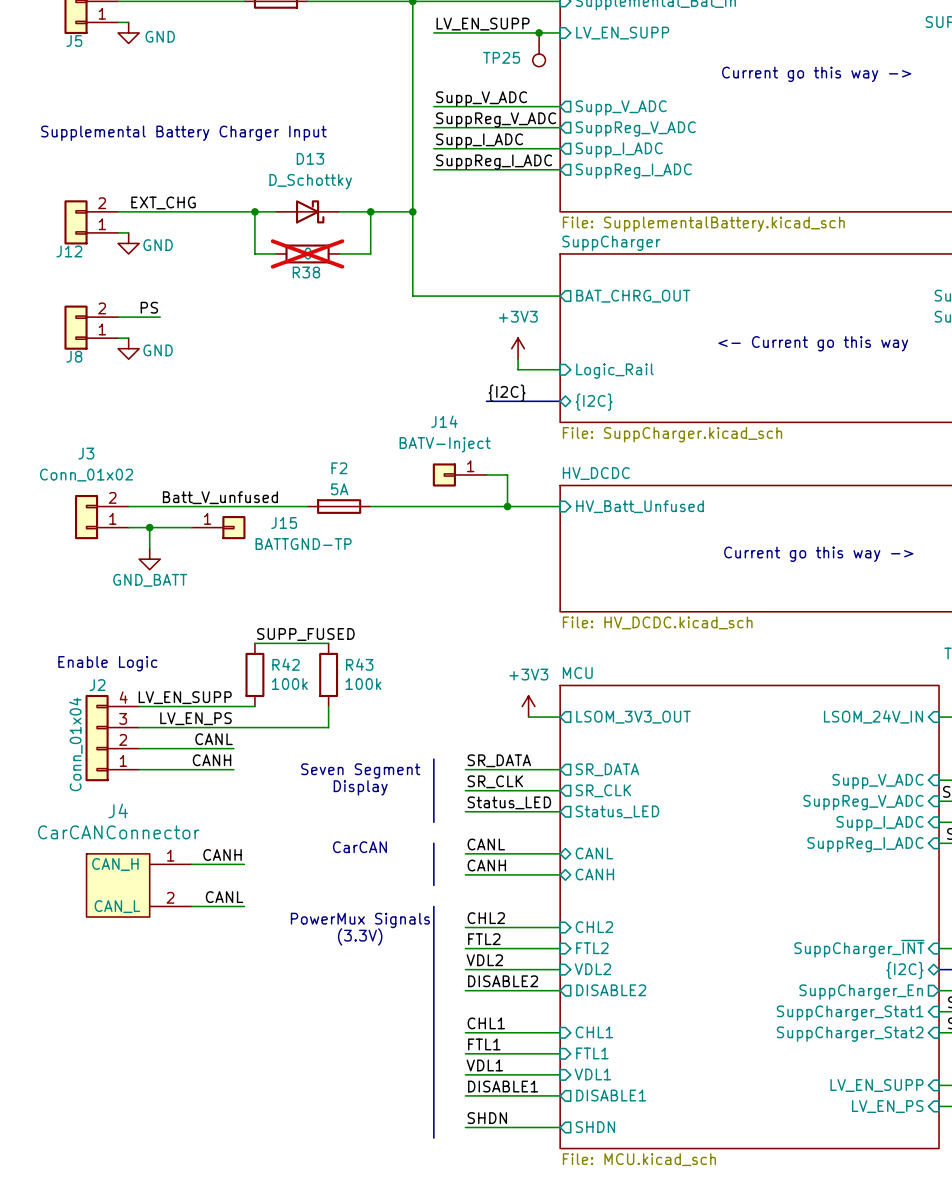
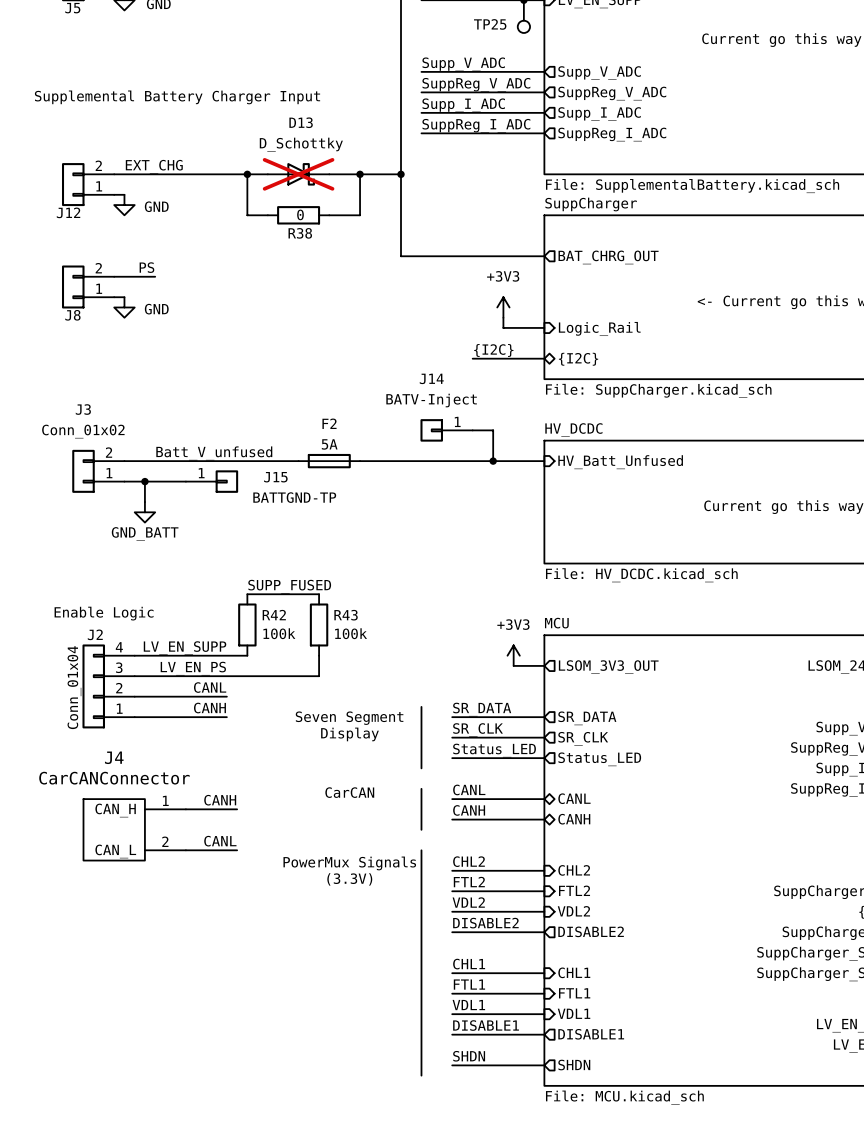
D13 do-not-place cross: none -> (298, 174)
R38 do-not-place cross: (307, 253) -> none

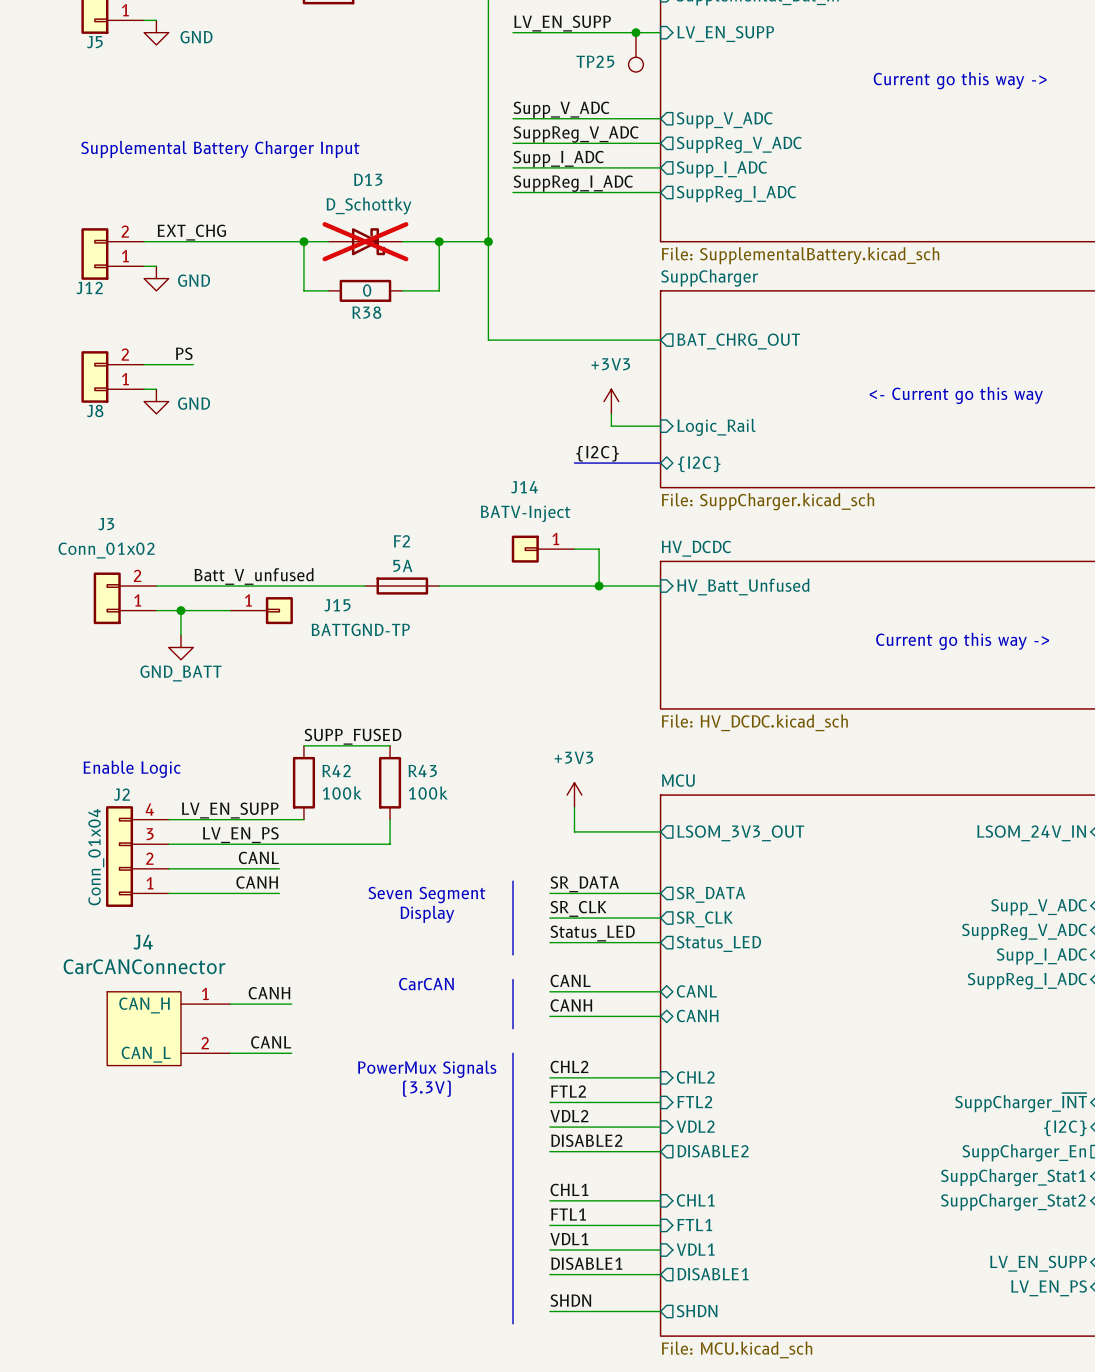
wire: none -> (574, 807) (574, 831) (623, 831)
power symbol position: +3V3 (513, 655) -> +3V3 (574, 795)

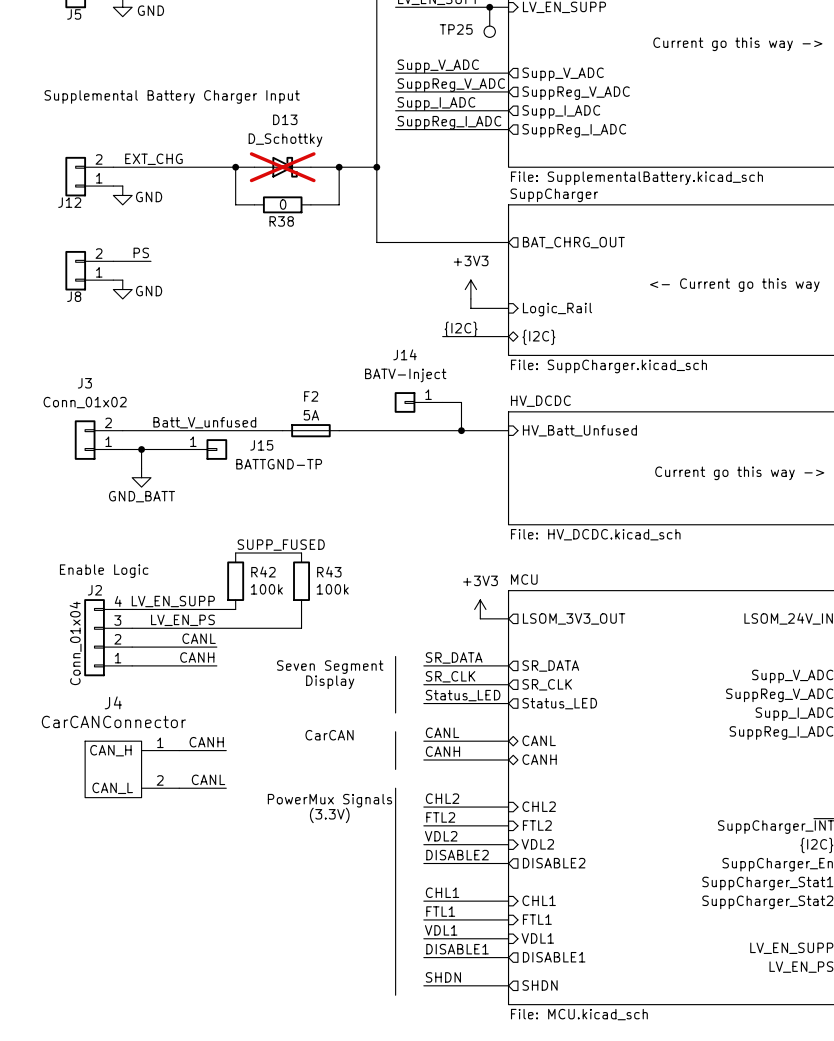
power symbol position: +3V3 (574, 795) -> +3V3 (480, 609)
wire: (574, 807) (574, 831) (623, 831) -> none

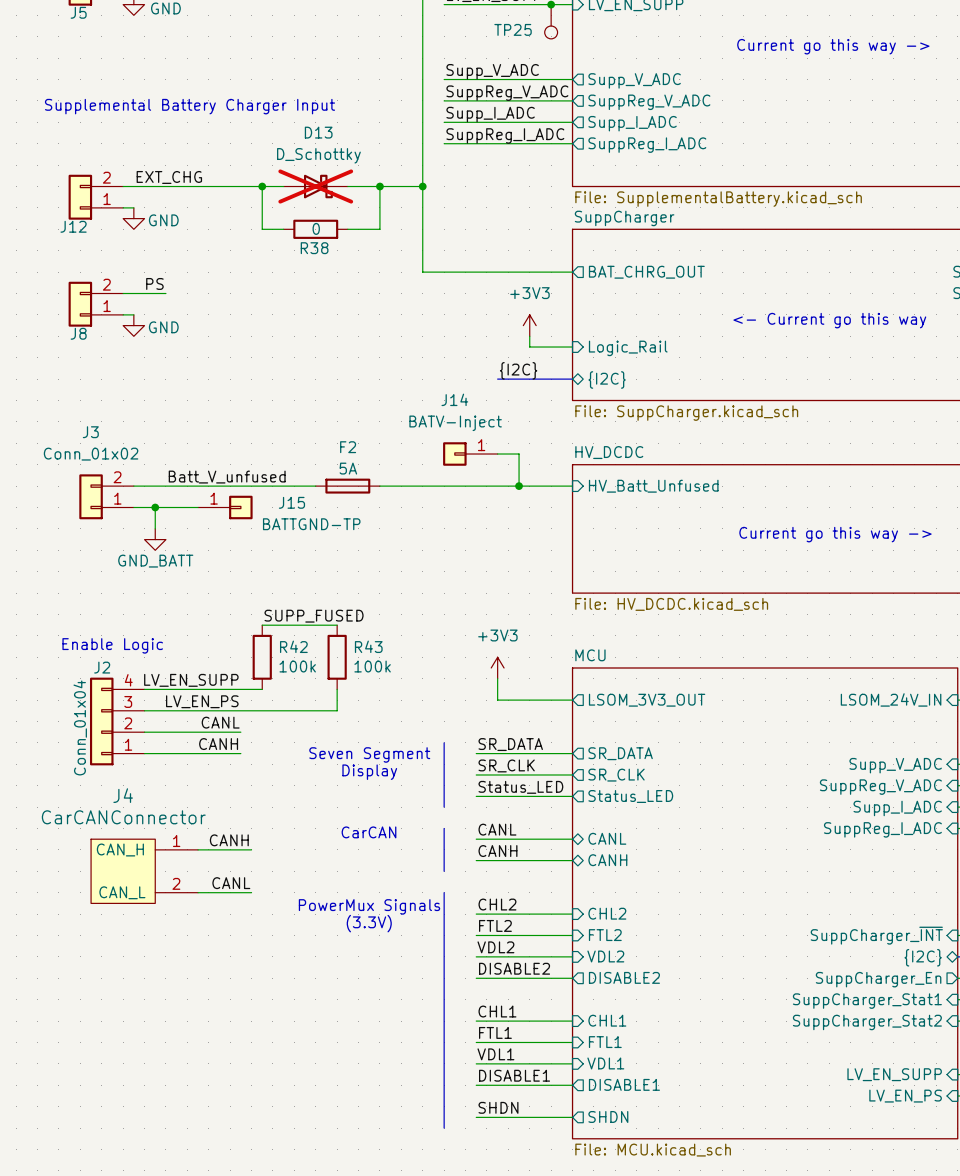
wire: none -> (497, 678) (497, 700) (540, 700)
power symbol position: +3V3 (480, 609) -> +3V3 (497, 667)

